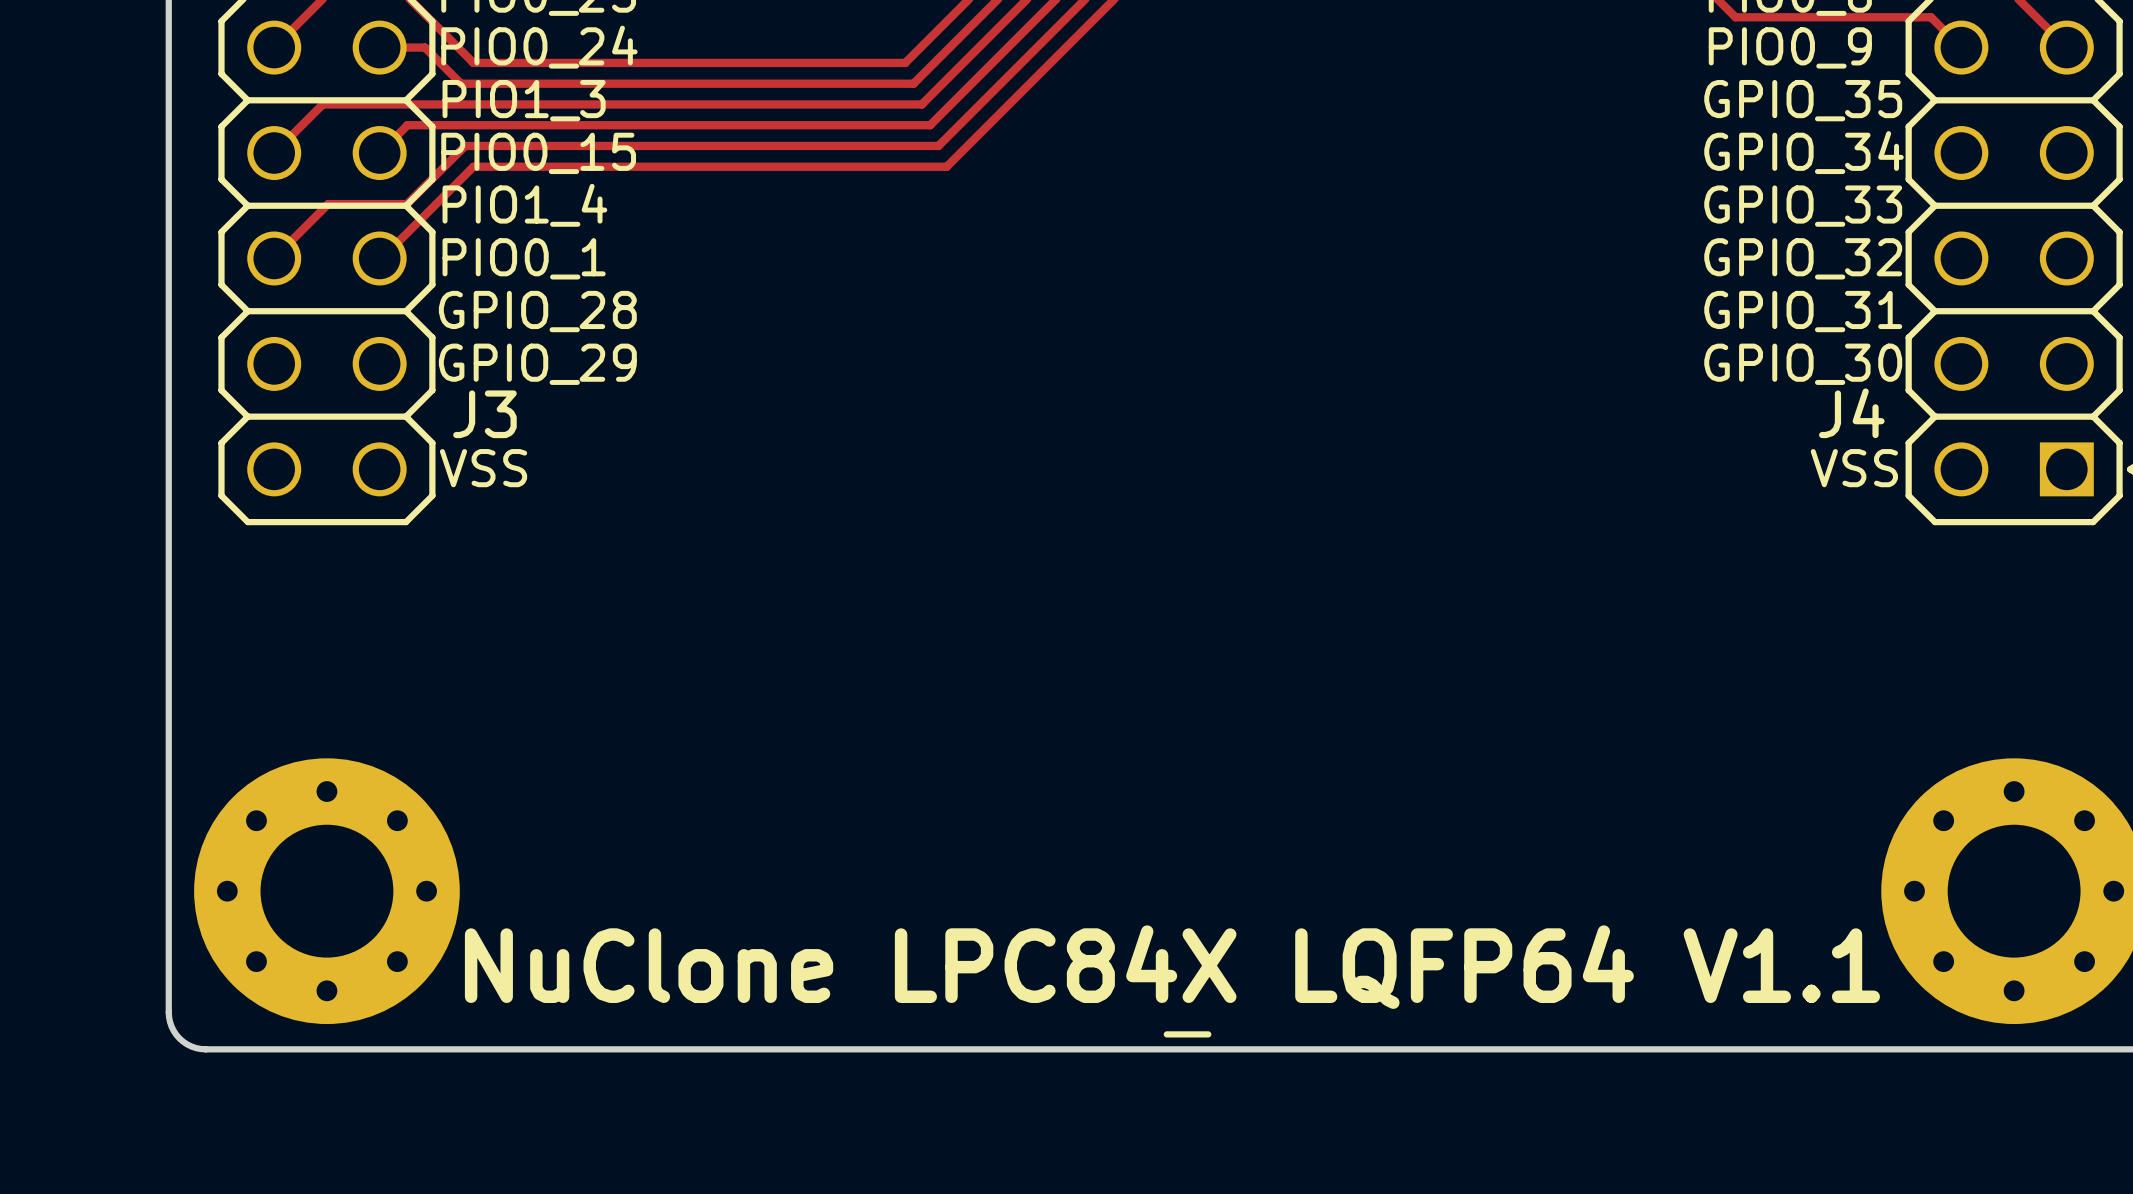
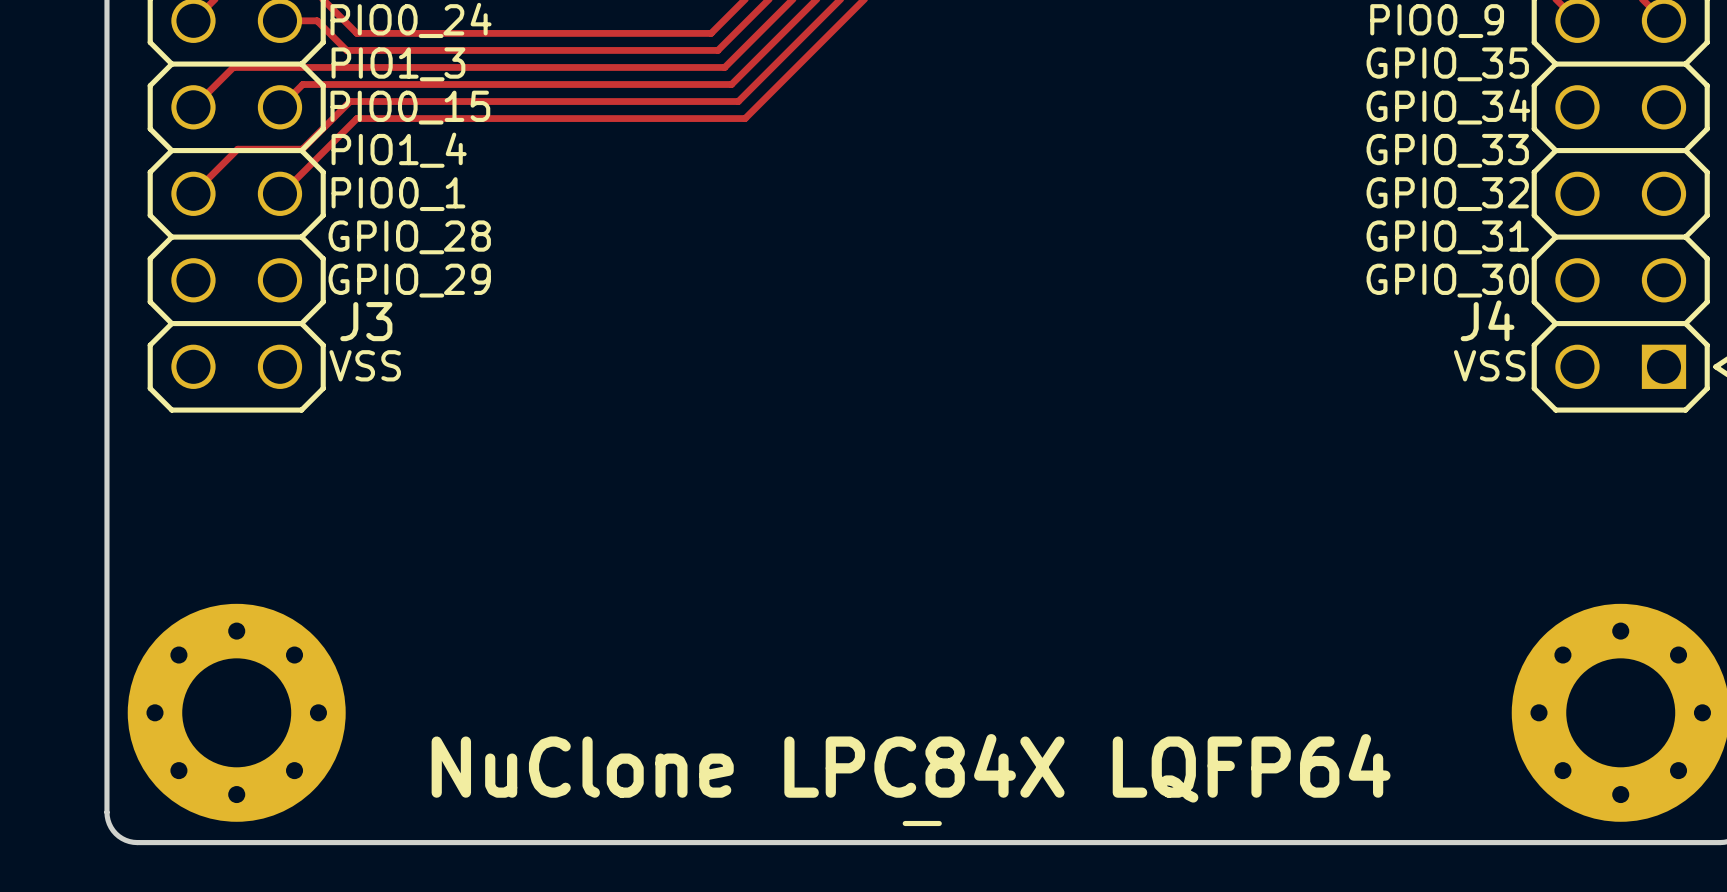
drawing shape: [464, 925, 1880, 1038] -> [431, 734, 1391, 827]

